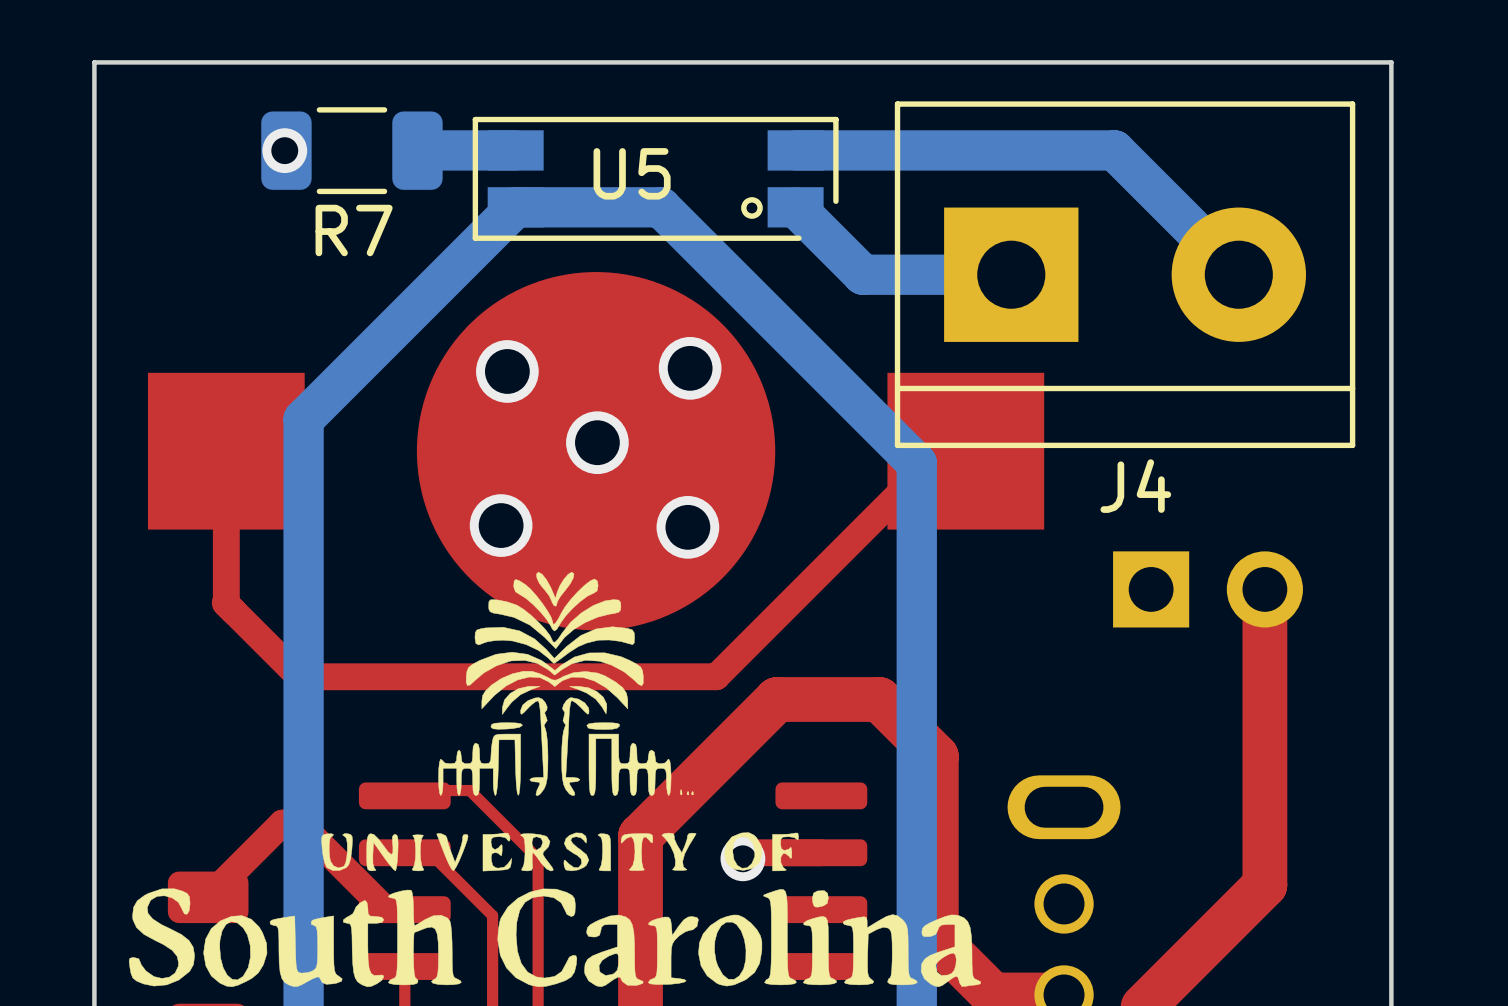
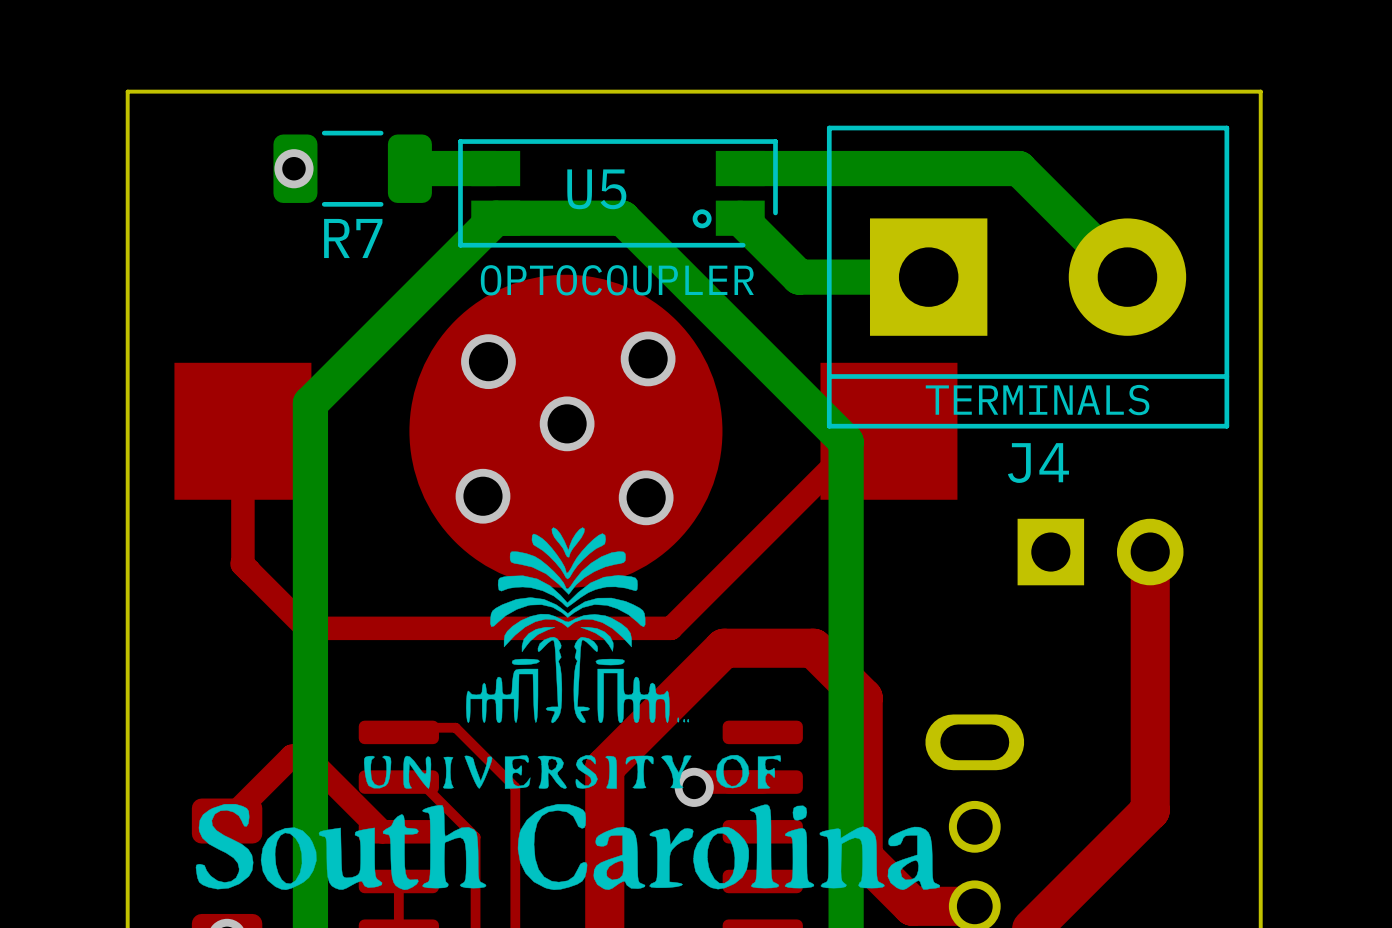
text: none -> OPTOCOUPLER (617, 280)
text: none -> TERMINALS (1037, 400)
drawing position: (554, 779) -> (567, 708)

